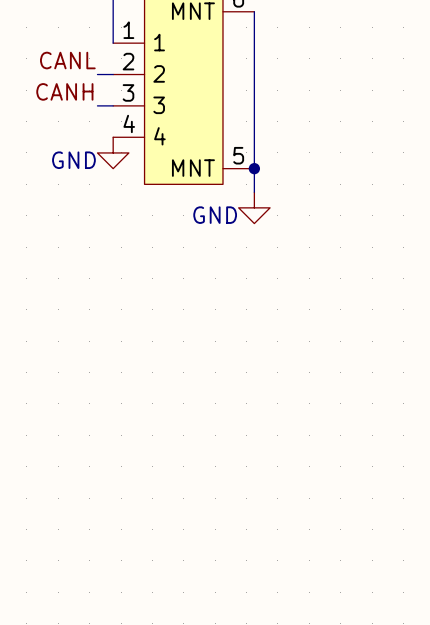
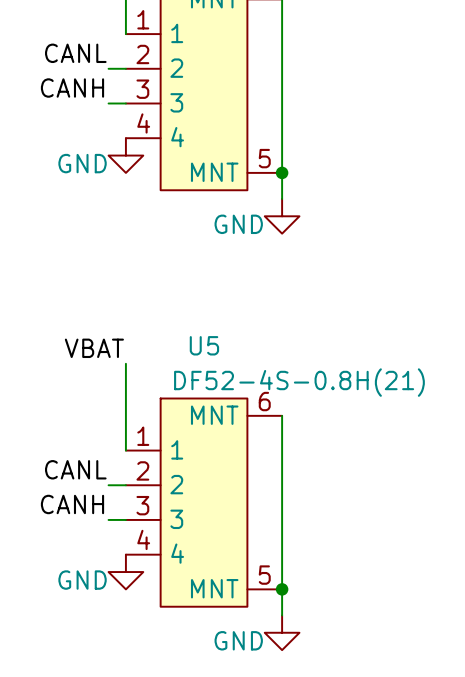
label: none -> VBAT (94, 348)
wire: none -> (125, 363) (125, 450)
wire: none -> (282, 415) (282, 615)
label: none -> CANL (75, 469)
wire: none -> (108, 485) (125, 485)
U5: none -> DF52-4S-0.8H(21) (204, 502)
label: none -> CANH (72, 504)
wire: none -> (108, 519) (125, 519)
power symbol: none -> GND (125, 572)
junction: none -> (282, 589)
power symbol: none -> GND (282, 632)

